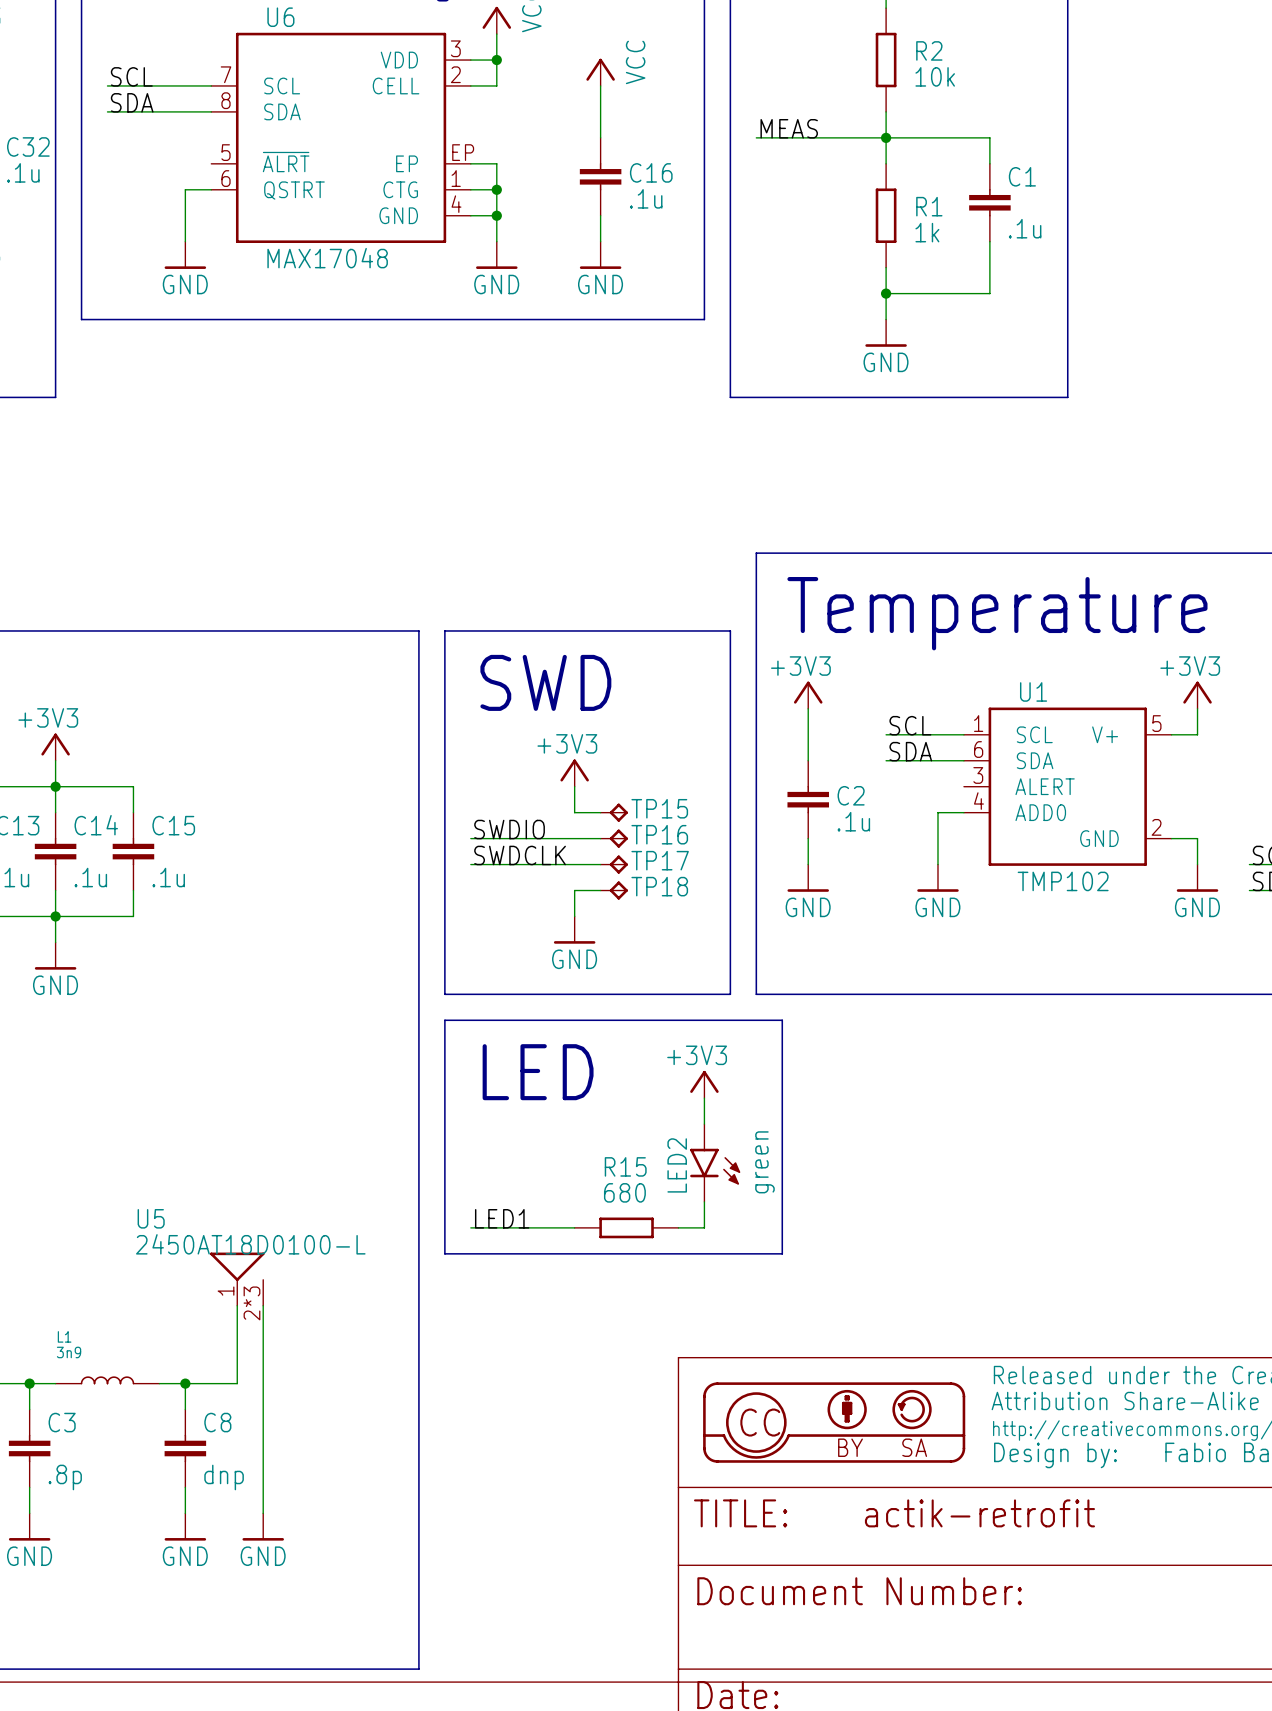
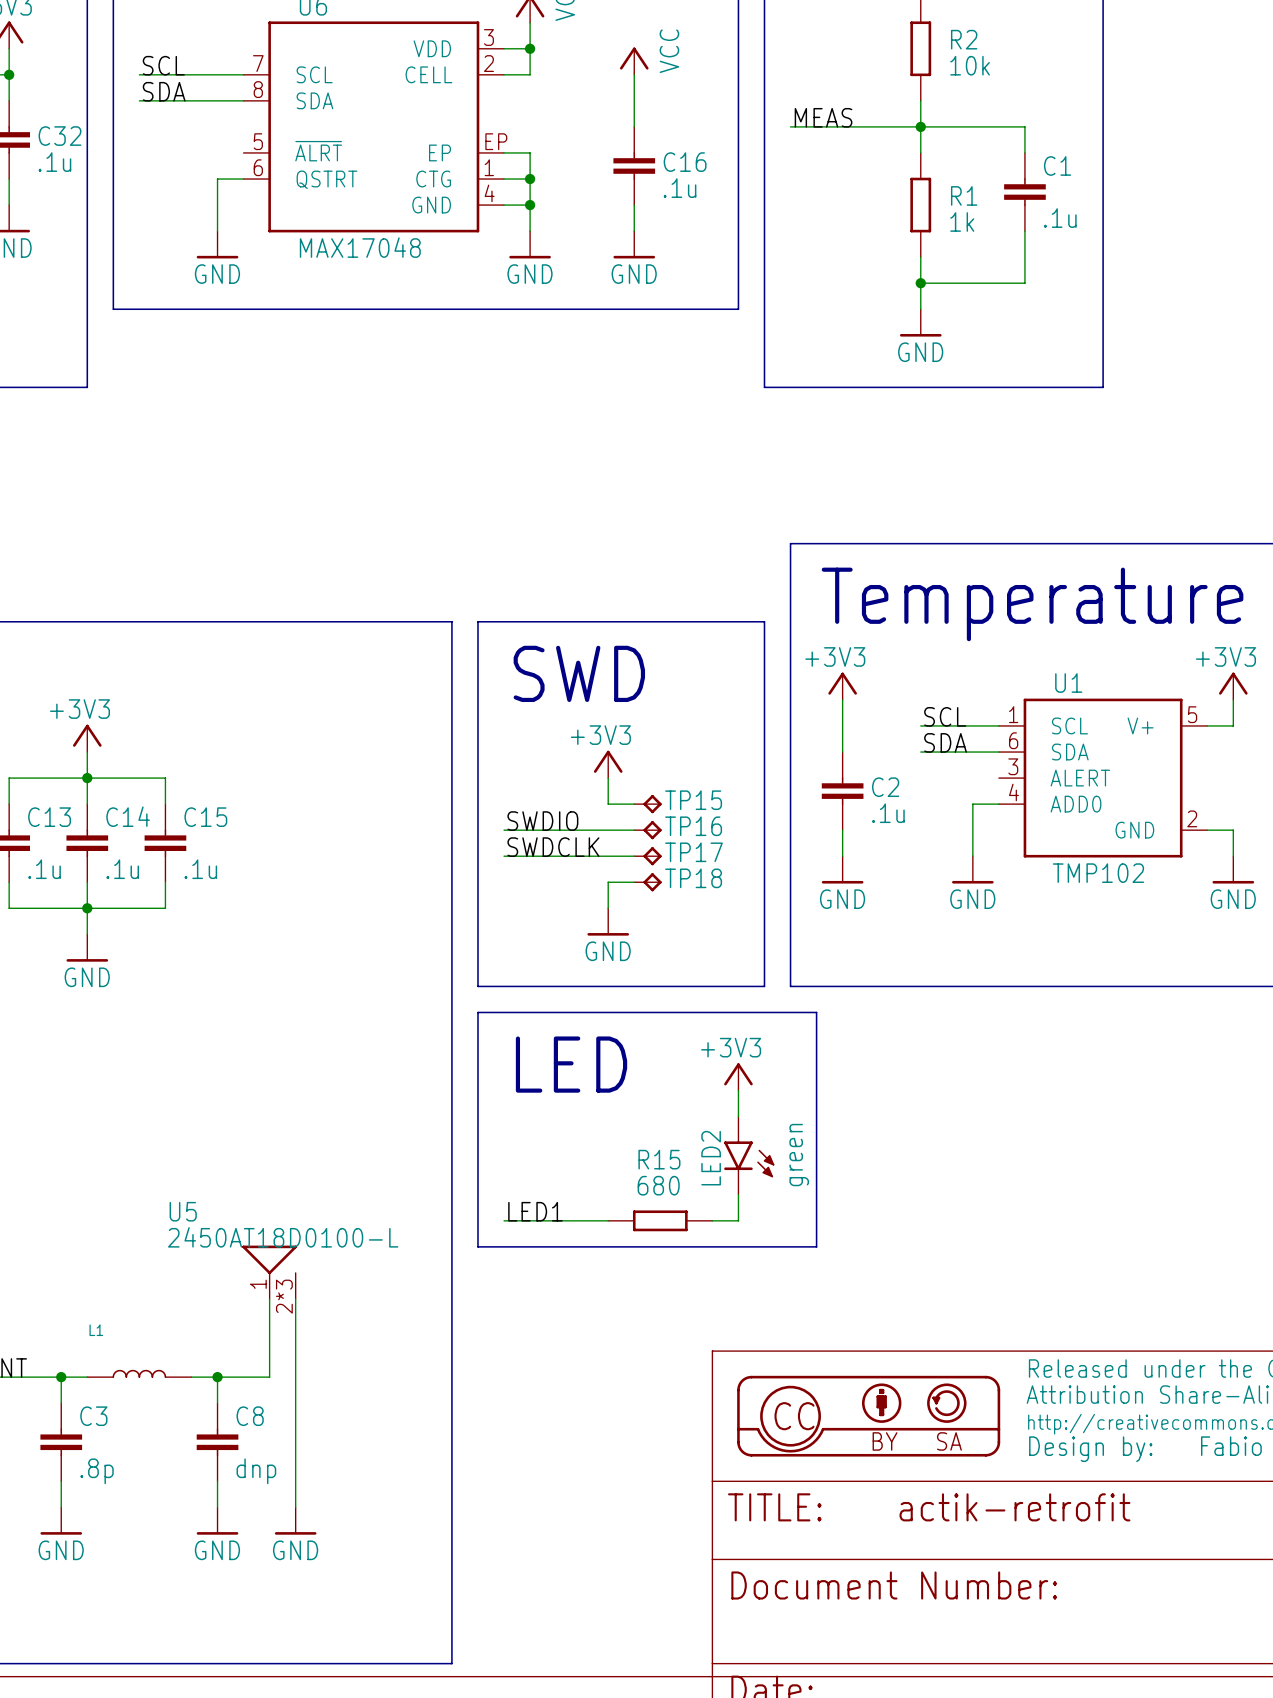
L1 value: 3n9 (69, 1352) -> none

